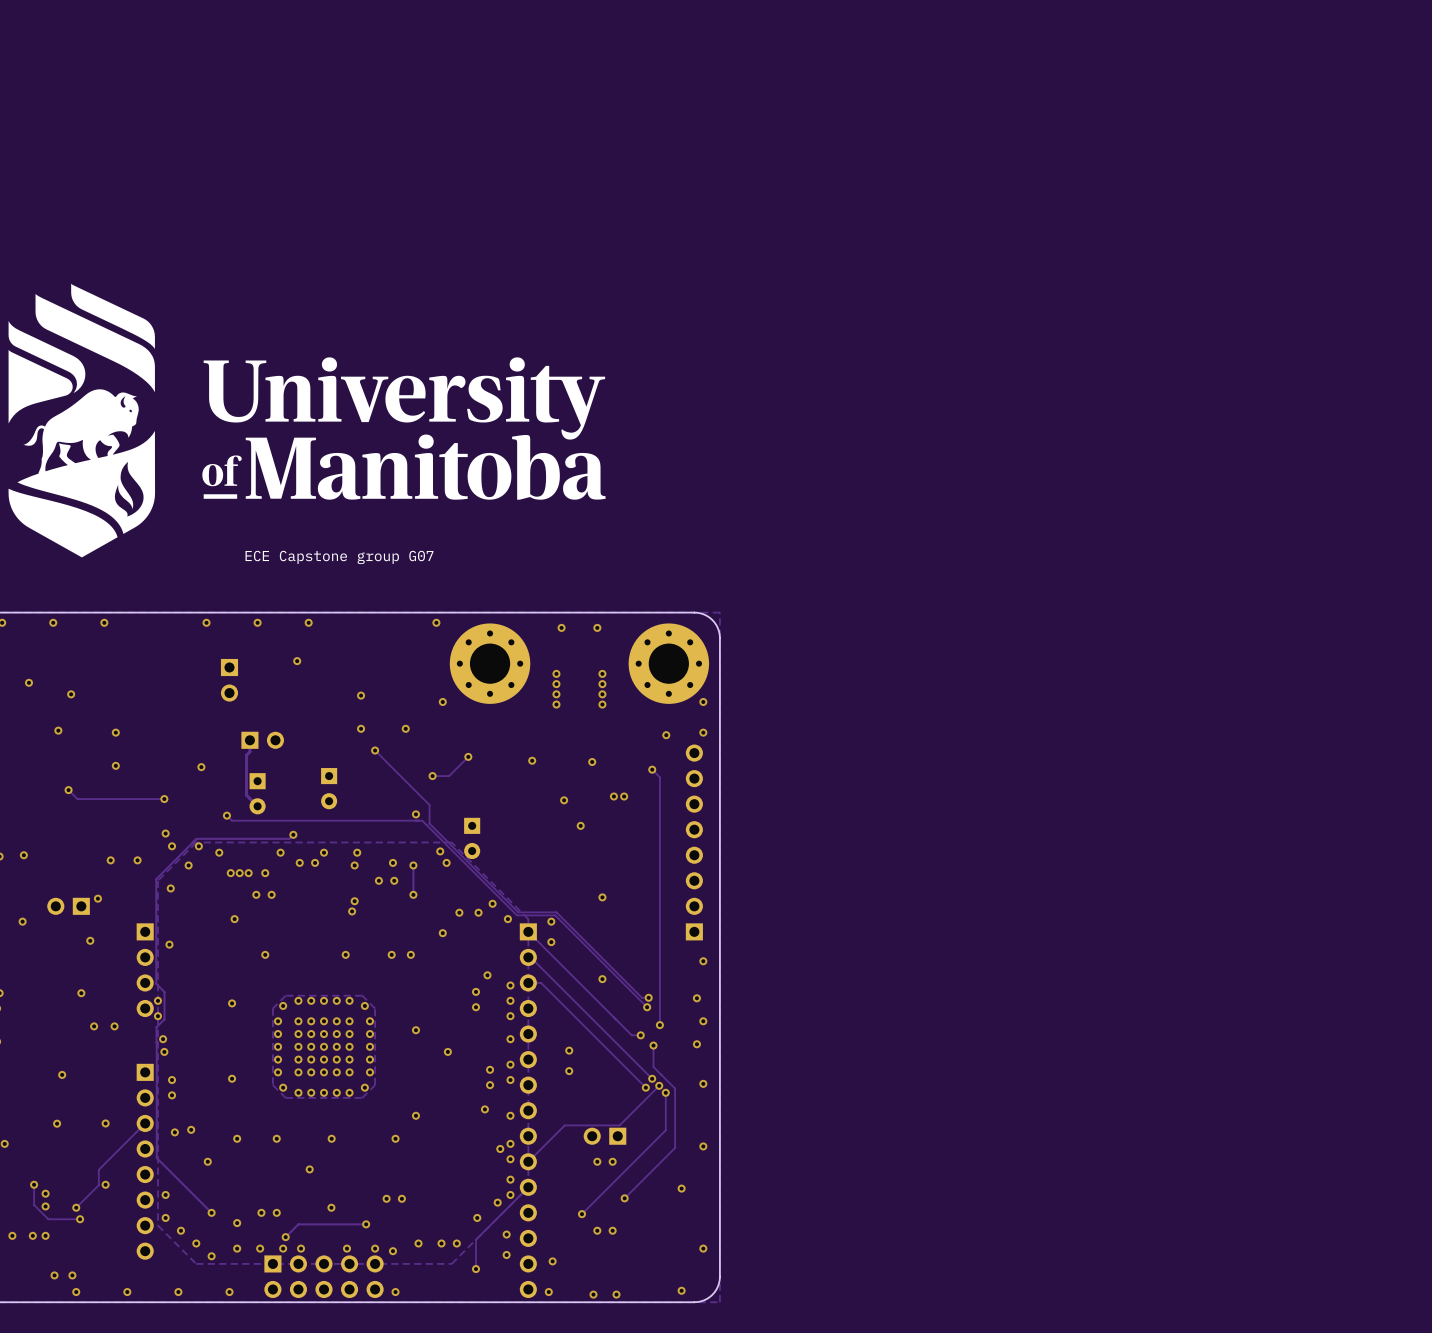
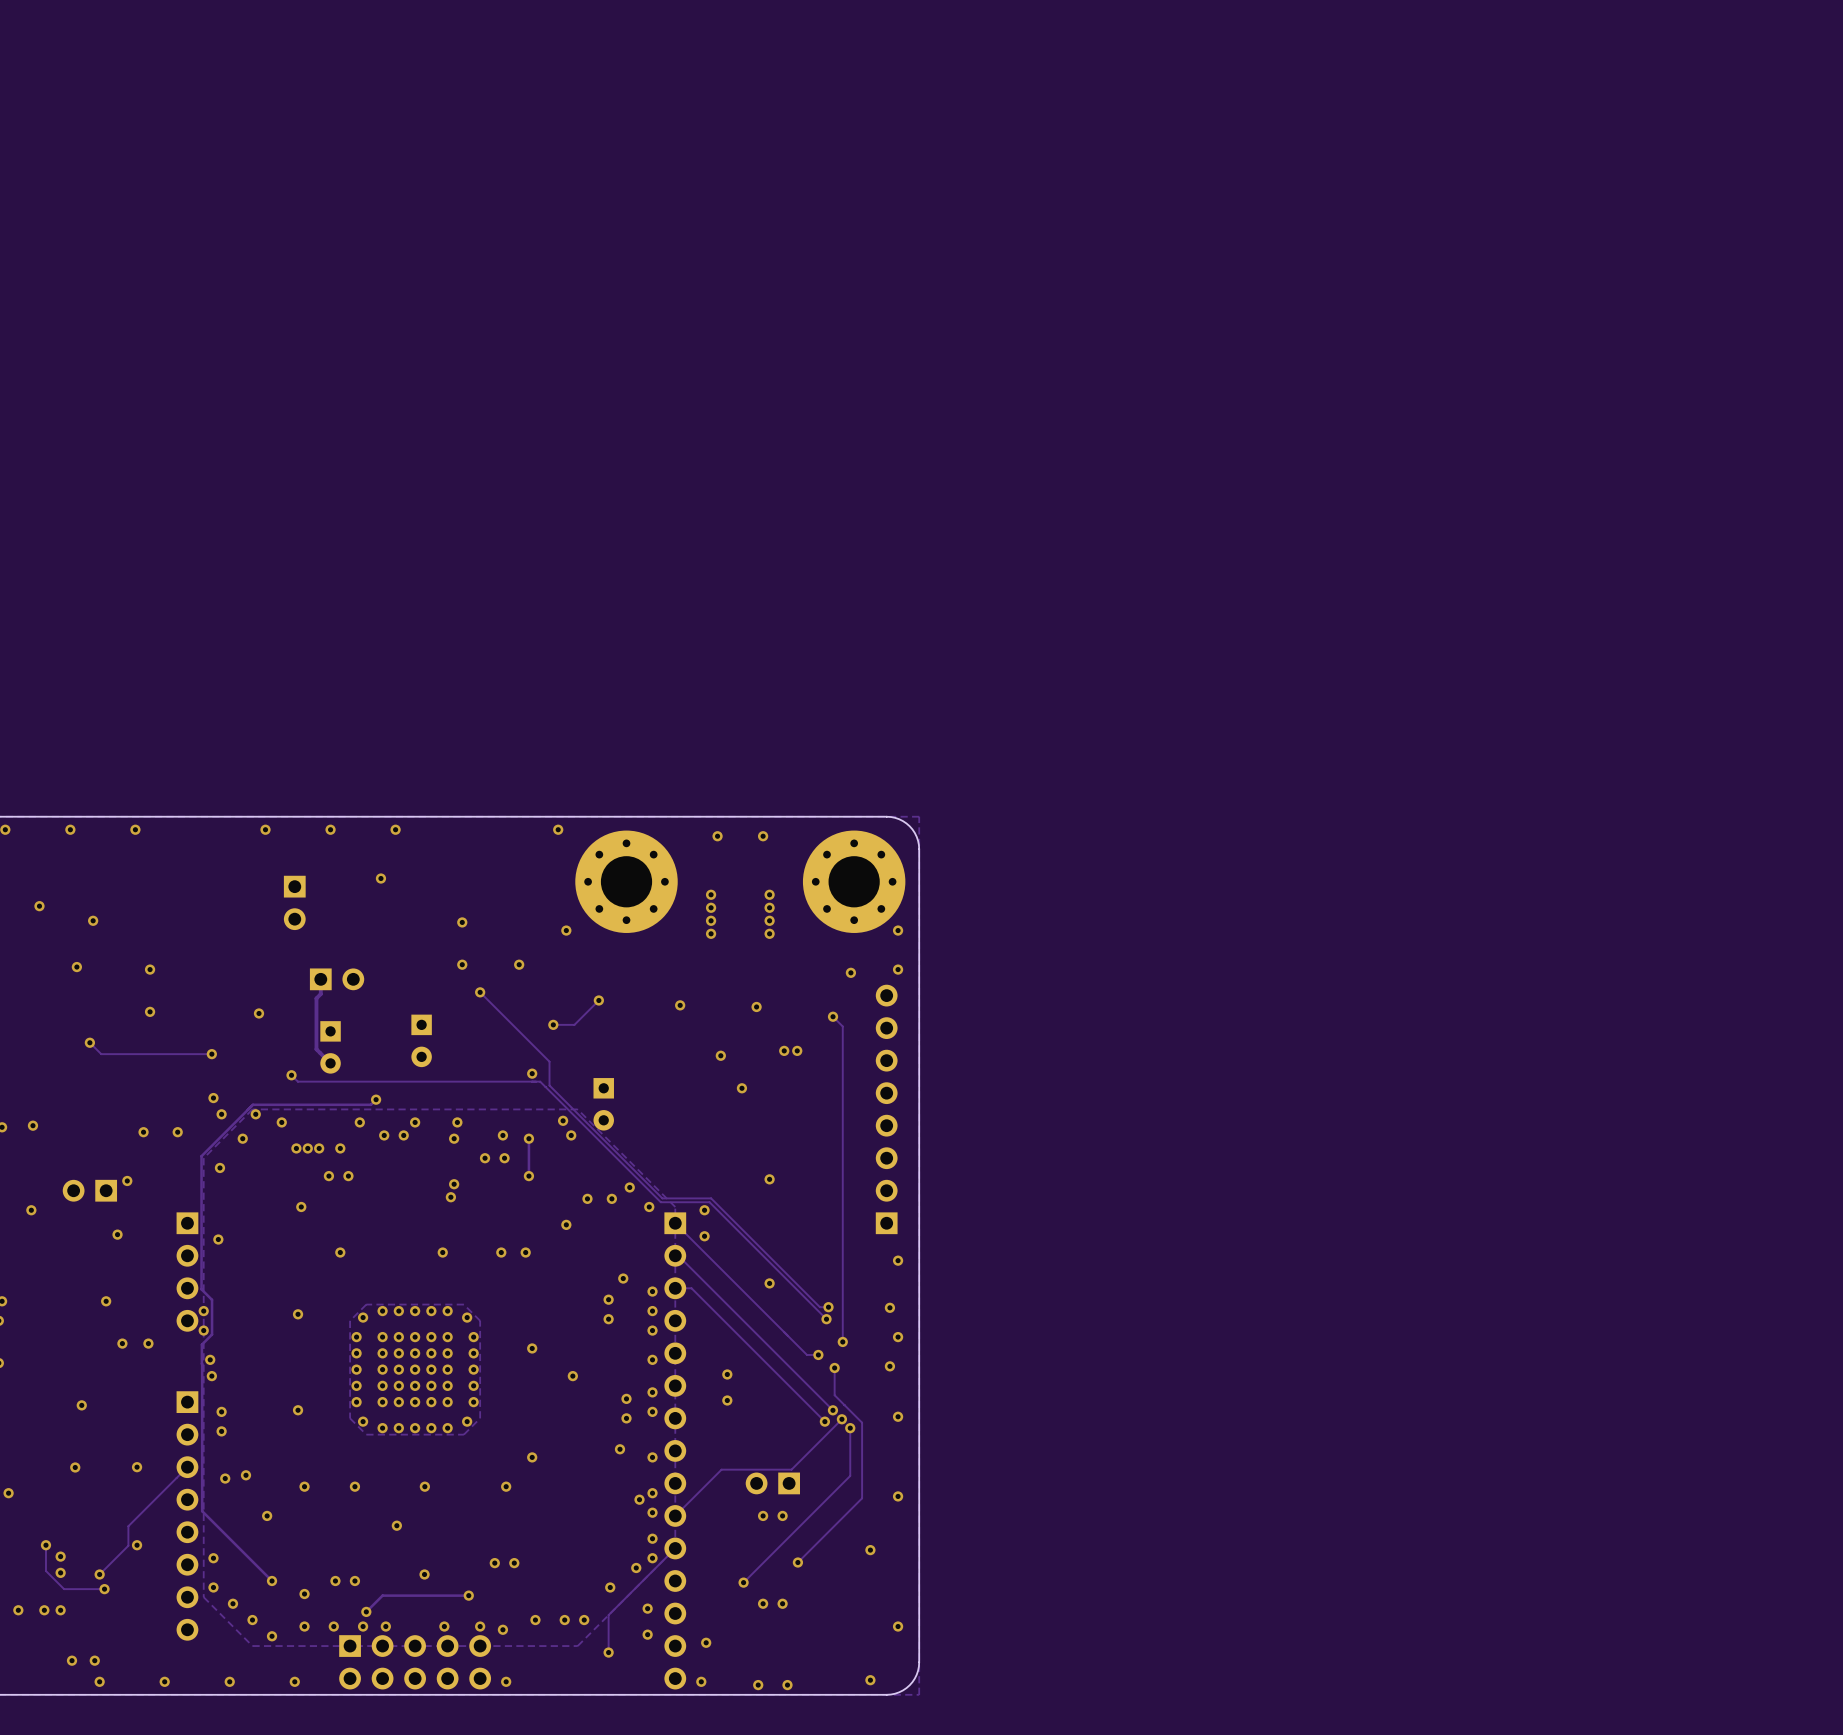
drawing: [8, 283, 606, 558] -> none
text: ECE Capstone group G07 (339, 557) -> none

